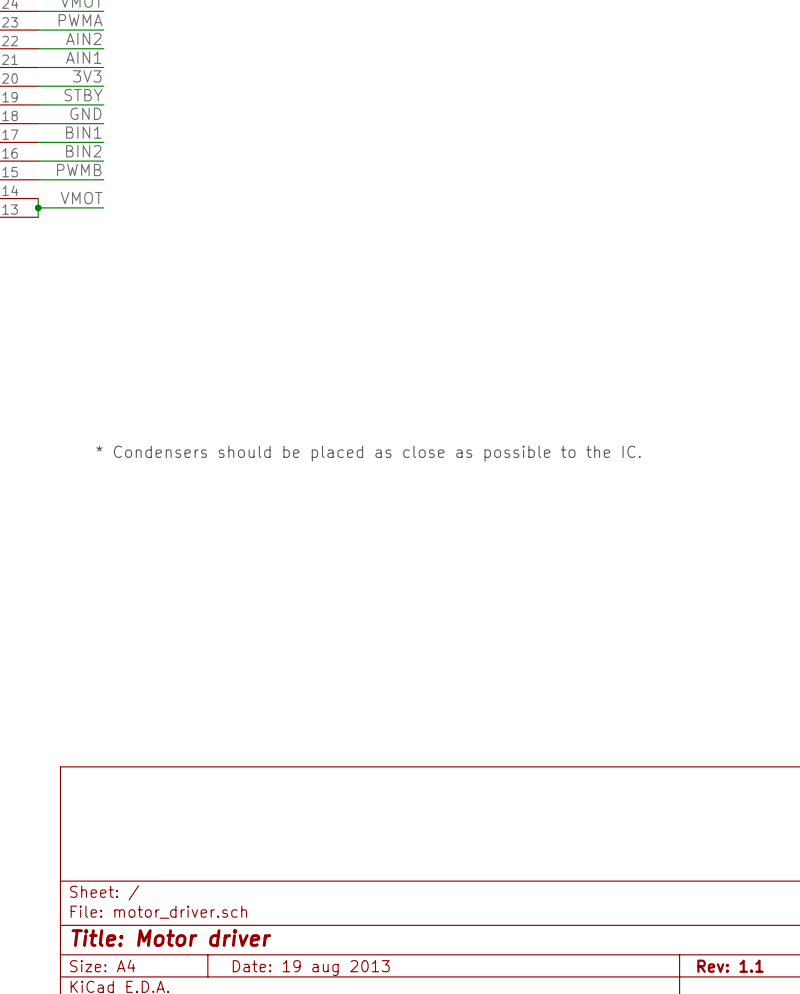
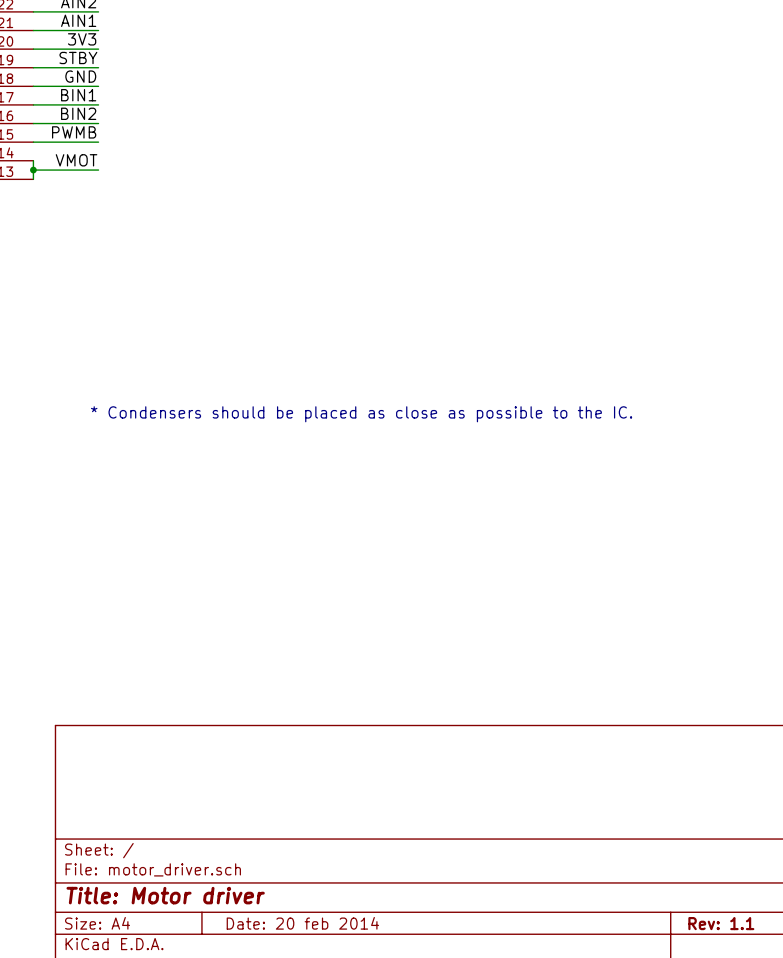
title block: Date: 19 aug 2013 (311, 968) -> Date: 20 feb 2014 (302, 923)

